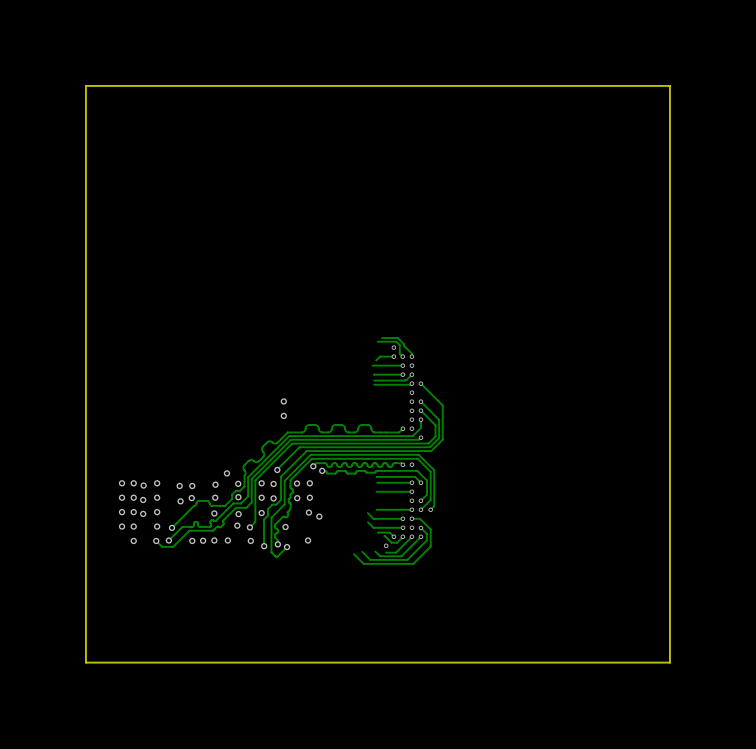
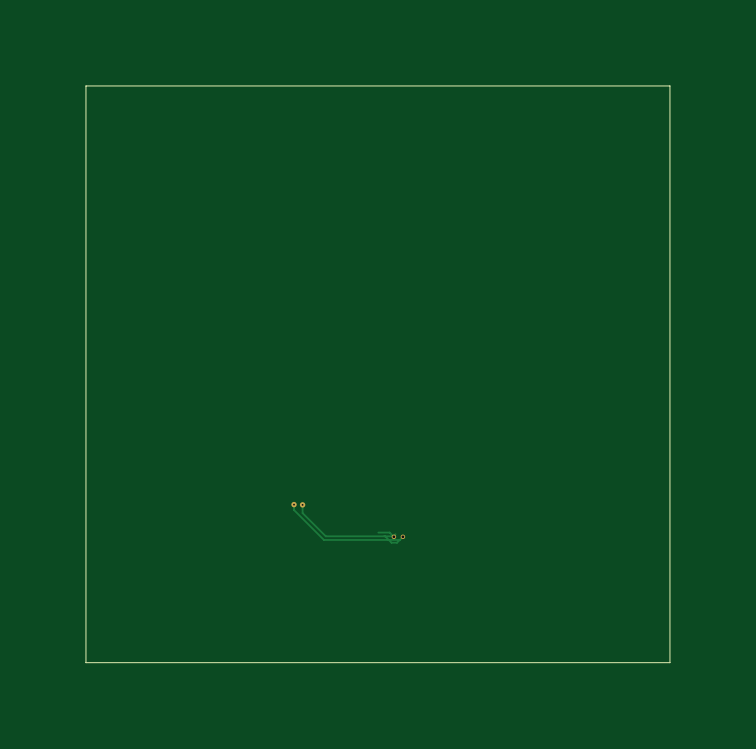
track: (382, 338) (397, 338) (411, 353) (411, 356) -> none
track: (377, 341) (396, 341) (399, 345) (399, 353) (402, 356) -> none
via: (393, 347) -> none
track: (393, 356) (380, 356) (376, 360) -> none
via: (393, 356) -> none
via: (402, 356) -> none
via: (411, 356) -> none
track: (402, 365) (372, 365) -> none
via: (402, 365) -> none
via: (411, 365) -> none
track: (402, 374) (374, 374) -> none
via: (402, 374) -> none
track: (411, 374) (405, 380) (374, 380) -> none
via: (411, 374) -> none
track: (411, 383) (374, 384) -> none
via: (411, 383) -> none
track: (420, 383) (442, 405) (442, 439) (431, 451) (306, 451) (281, 476) (281, 499) (267, 509) (267, 515) (263, 519) (263, 546) -> none
via: (420, 383) -> none
via: (411, 392) -> none
via: (283, 401) -> none
via: (411, 401) -> none
track: (420, 401) (439, 419) (439, 438) (429, 447) (299, 447) (277, 469) -> none
via: (420, 401) -> none
via: (411, 410) -> none
track: (420, 410) (435, 425) (435, 436) (428, 443) (292, 443) (255, 480) (255, 522) (249, 527) -> none
via: (420, 410) -> none
via: (283, 415) -> none
via: (411, 419) -> none
track: (420, 419) (420, 427) (412, 436) (289, 436) (248, 477) (248, 496) (241, 503) (233, 503) (216, 520) (213, 520) -> none
via: (420, 419) -> none
track: (402, 428) (399, 432) (374, 432) (369, 425) (361, 424) (356, 431) (348, 432) (343, 425) (335, 424) (330, 431) (322, 432) (316, 425) (309, 424) (303, 432) (287, 432) (276, 443) (267, 442) (262, 448) (263, 455) (258, 461) (250, 460) (244, 465) (244, 486) (240, 490) (235, 490) (232, 494) (232, 498) (225, 505) (211, 505) (208, 501) (197, 501) (172, 527) -> none
via: (402, 428) -> none
via: (411, 428) -> none
track: (420, 437) (418, 439) (290, 439) (251, 478) (251, 502) (246, 507) (235, 507) (223, 520) (223, 524) (220, 527) (217, 526) (213, 530) (189, 530) (173, 546) (162, 546) (156, 540) -> none
via: (420, 437) -> none
track: (402, 464) (394, 463) (389, 466) (384, 463) (379, 466) (374, 463) (369, 466) (364, 463) (359, 466) (354, 463) (349, 466) (343, 463) (338, 466) (333, 463) (328, 466) (325, 463) (316, 463) (313, 466) -> none
via: (402, 464) -> none
via: (411, 464) -> none
via: (313, 466) -> none
via: (277, 469) -> none
track: (322, 470) (327, 473) (335, 473) (337, 470) (345, 470) (347, 473) (355, 473) (357, 470) (366, 472) (417, 470) (427, 480) (427, 494) (420, 500) -> none
via: (322, 470) -> none
via: (226, 473) -> none
track: (376, 476) (415, 476) (420, 482) -> none
track: (411, 482) (377, 482) -> none
via: (411, 482) -> none
via: (420, 482) -> none
via: (122, 483) -> none
via: (133, 483) -> none
via: (157, 483) -> none
via: (238, 483) -> none
via: (261, 483) -> none
via: (273, 483) -> none
via: (297, 483) -> none
via: (309, 483) -> none
via: (215, 484) -> none
via: (143, 485) -> none
via: (179, 486) -> none
via: (192, 486) -> none
track: (411, 491) (376, 491) -> none
via: (411, 491) -> none
via: (122, 497) -> none
via: (133, 497) -> none
via: (157, 497) -> none
via: (215, 497) -> none
via: (238, 497) -> none
via: (261, 497) -> none
via: (309, 497) -> none
via: (191, 498) -> none
via: (273, 498) -> none
via: (297, 498) -> none
via: (143, 499) -> none
via: (411, 500) -> none
via: (420, 500) -> none
via: (180, 501) -> none
track: none -> (294, 504) (294, 510) (323, 539) (399, 539)
via: none -> (294, 504)
track: none -> (302, 504) (302, 513) (325, 536) (393, 536) (395, 534)
via: none -> (302, 504)
track: (411, 509) (376, 509) -> none
via: (411, 509) -> none
track: (420, 509) (430, 500) (430, 471) (417, 458) (311, 458) (290, 480) (290, 487) (293, 490) (288, 499) (290, 509) (286, 516) (283, 516) (275, 524) (277, 530) (275, 534) (277, 544) -> none
via: (420, 509) -> none
track: (430, 509) (434, 506) (434, 470) (418, 454) (310, 454) (284, 480) (284, 504) (271, 517) (271, 552) (277, 556) (287, 547) -> none
via: (430, 509) -> none
via: (122, 512) -> none
via: (133, 512) -> none
via: (157, 512) -> none
via: (308, 512) -> none
via: (143, 513) -> none
via: (214, 513) -> none
via: (261, 513) -> none
track: (367, 513) (373, 518) (402, 518) -> none
via: (238, 514) -> none
via: (319, 516) -> none
via: (402, 518) -> none
track: (411, 518) (420, 518) (430, 529) (430, 546) (413, 563) (363, 563) (353, 554) -> none
via: (411, 518) -> none
track: (213, 520) (210, 521) (210, 523) -> none
track: (367, 522) (373, 527) (403, 527) -> none
track: (210, 523) (209, 526) (199, 526) (195, 521) (192, 526) (182, 526) (168, 540) -> none
via: (237, 525) -> none
via: (122, 526) -> none
via: (133, 526) -> none
via: (157, 526) -> none
via: (285, 526) -> none
via: (172, 527) -> none
via: (249, 527) -> none
via: (403, 527) -> none
via: (411, 527) -> none
track: (420, 527) (426, 533) (426, 540) (407, 559) (370, 559) (362, 551) -> none
via: (420, 527) -> none
track: (411, 536) (396, 552) (385, 552) -> none
via: (411, 536) -> none
track: (420, 536) (401, 556) (380, 556) (375, 551) -> none
via: (420, 536) -> none
via: (133, 540) -> none
via: (156, 540) -> none
via: (168, 540) -> none
via: (192, 540) -> none
via: (203, 540) -> none
via: (214, 540) -> none
via: (227, 540) -> none
via: (250, 540) -> none
via: (308, 540) -> none
via: (277, 544) -> none
via: (386, 545) -> none
via: (264, 546) -> none
via: (287, 547) -> none

